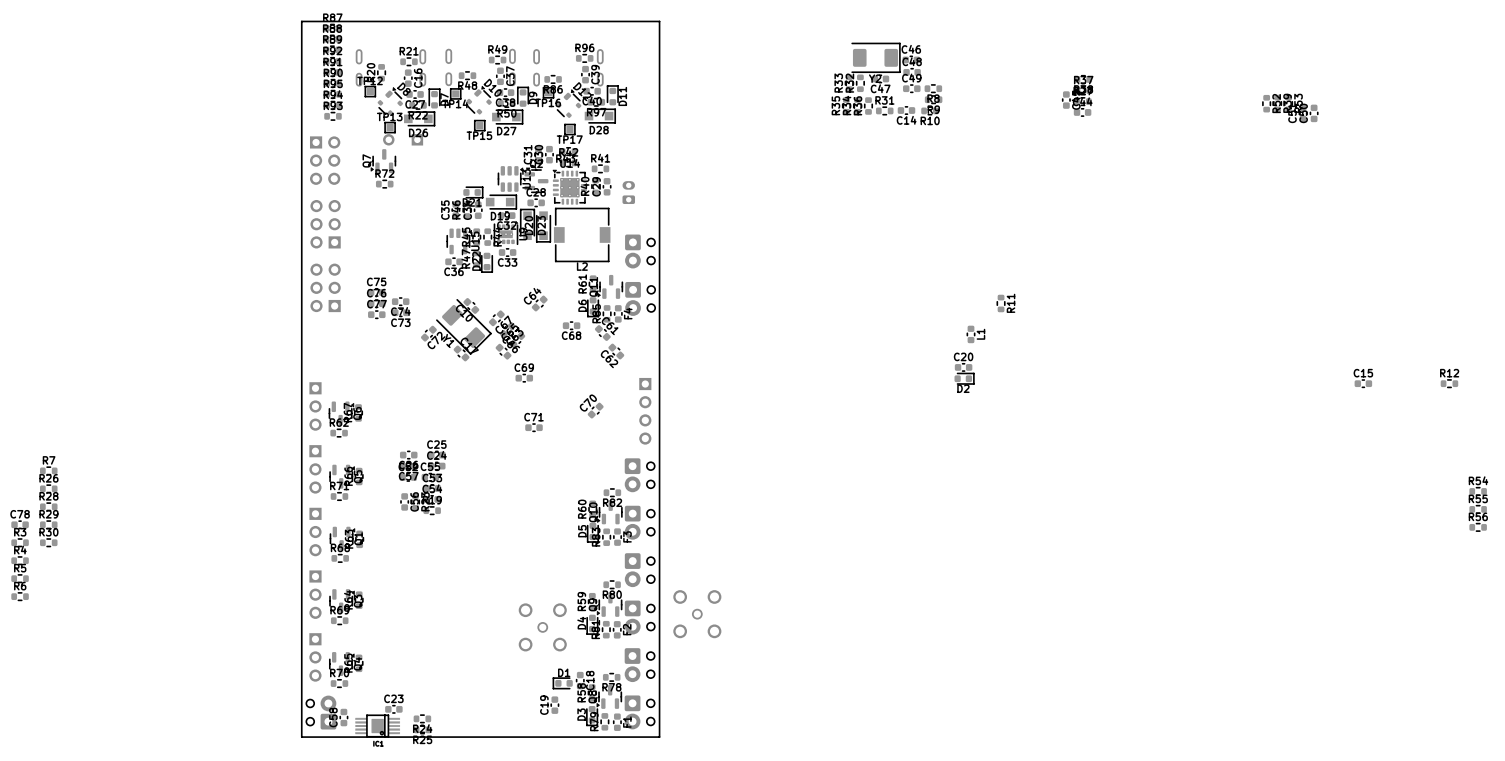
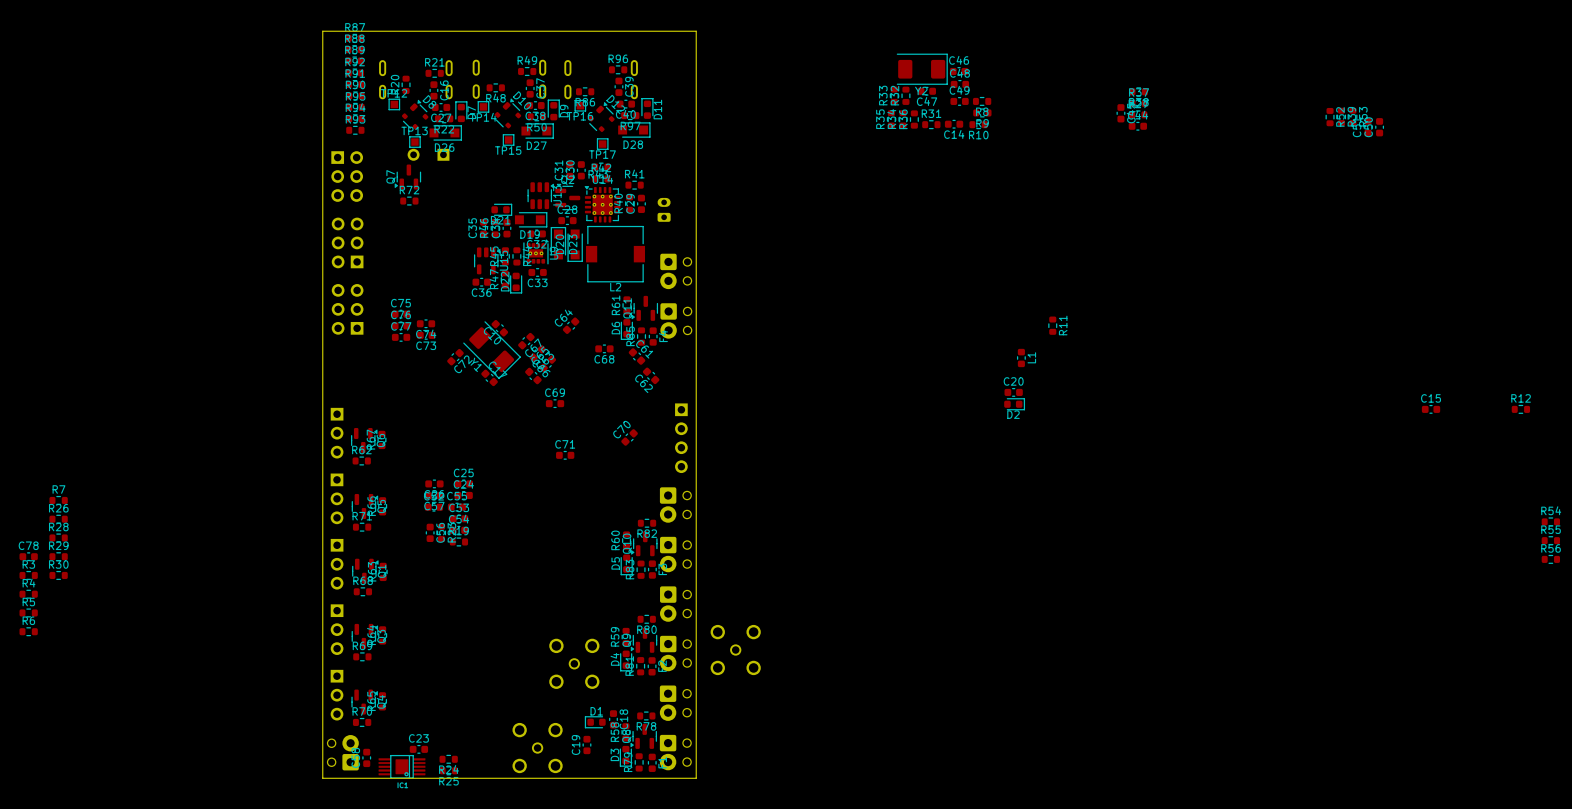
part: none -> (537, 748)

